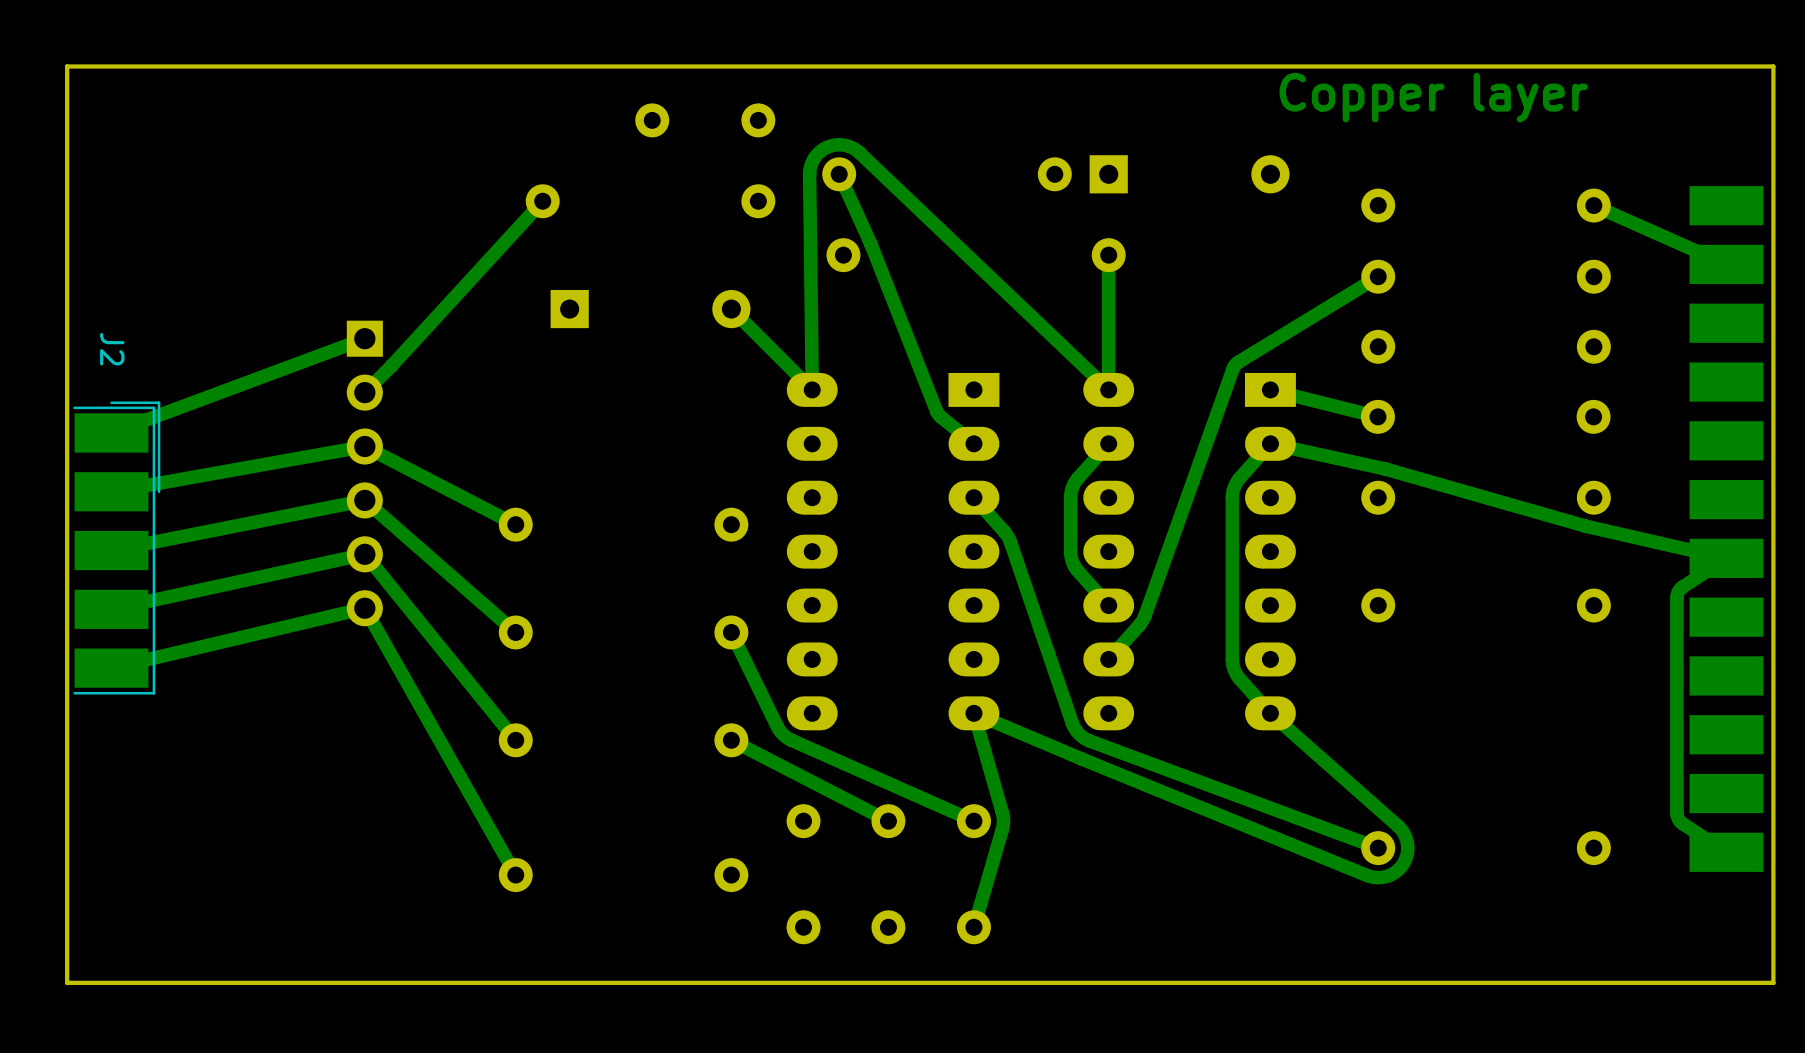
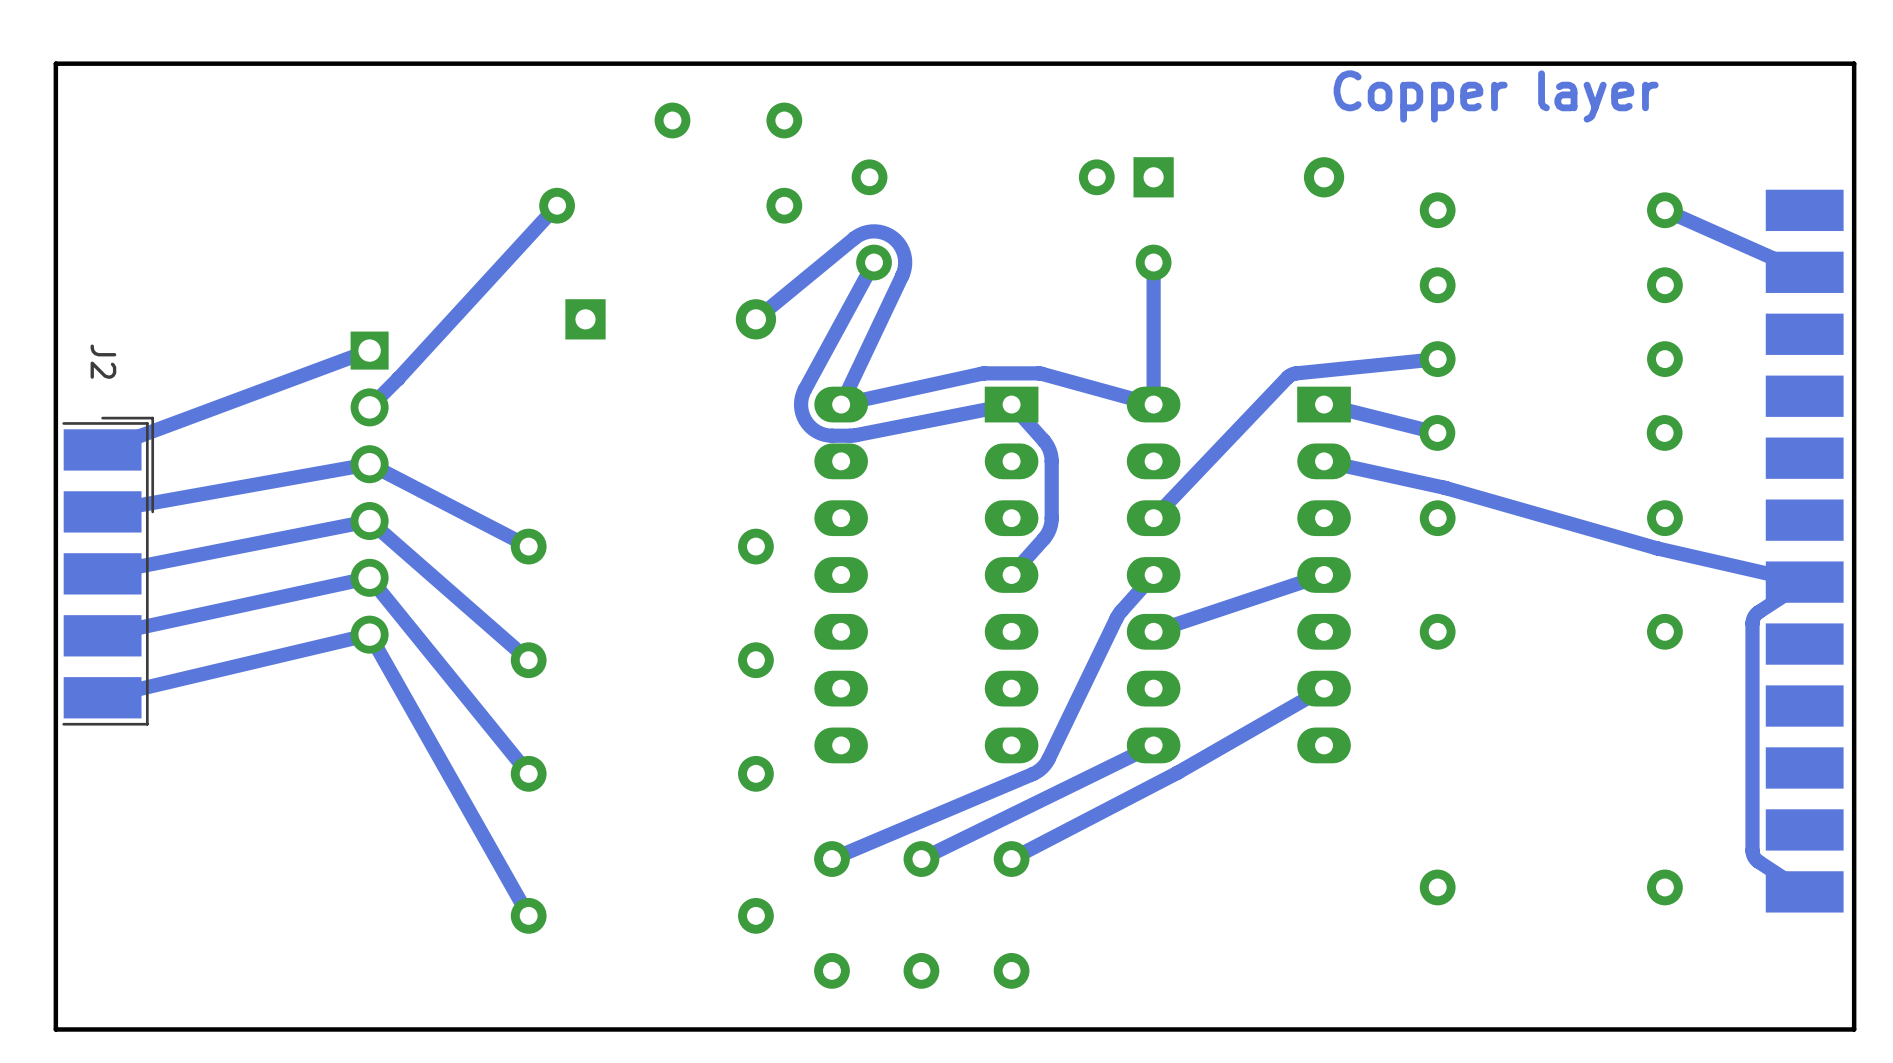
track: (839, 174) (870, 244) (937, 412) (973, 443) -> none
track: none -> (874, 262) (803, 393) (801, 405) (803, 416) (810, 426) (820, 433) (828, 435) (853, 435) (1011, 404) (1046, 443) (1051, 461) (1051, 518) (1049, 529) (1043, 538) (1011, 574)
track: (1378, 276) (1234, 366) (1143, 618) (1108, 659) -> none
track: (731, 309) (812, 389) (809, 170) (813, 159) (823, 148) (834, 145) (846, 145) (859, 152) (1108, 389) -> (755, 319) (857, 236) (867, 231) (879, 231) (890, 235) (898, 243) (903, 253) (904, 268) (841, 404) (984, 373) (1041, 373) (1153, 404)
track: none -> (1437, 359) (1291, 374) (1153, 518)
track: (1108, 443) (1075, 480) (1070, 497) (1070, 551) (1072, 562) (1108, 605) -> (1324, 574) (1153, 631)
track: (1270, 443) (1237, 480) (1232, 494) (1232, 659) (1234, 669) (1239, 679) (1270, 713) (1400, 828) (1407, 845) (1403, 863) (1389, 875) (1370, 876) (1082, 759) -> none
track: (973, 497) (1009, 539) (1072, 722) (1081, 736) (1089, 741) (1378, 848) -> none
track: none -> (1153, 574) (1117, 616) (1048, 758) (1042, 768) (1032, 774) (831, 859)
track: (731, 632) (777, 726) (785, 736) (973, 821) -> (1324, 688) (1176, 773) (1011, 859)
track: (731, 740) (888, 821) -> (1153, 745) (921, 859)
track: (1082, 759) (973, 713) (1003, 821) (973, 927) -> none

